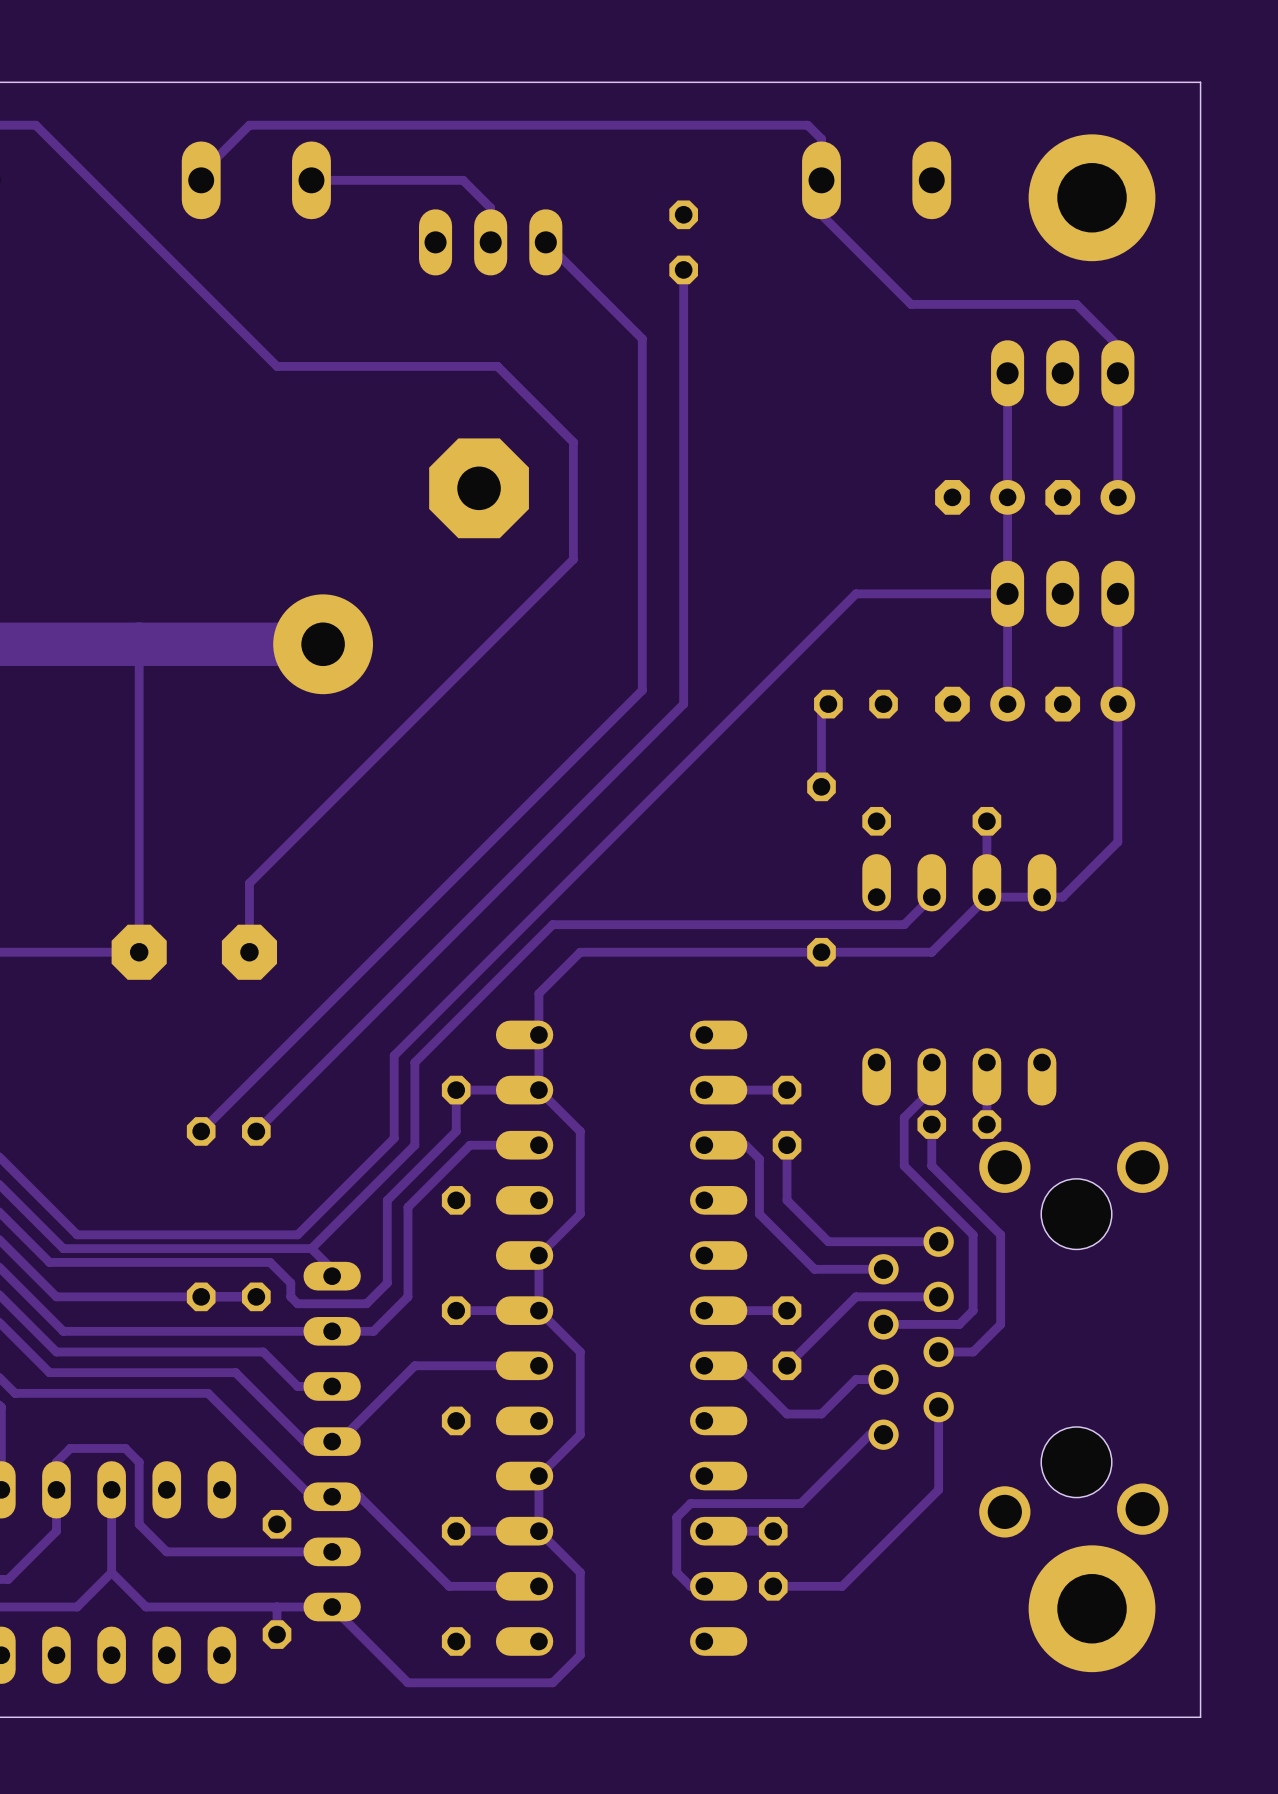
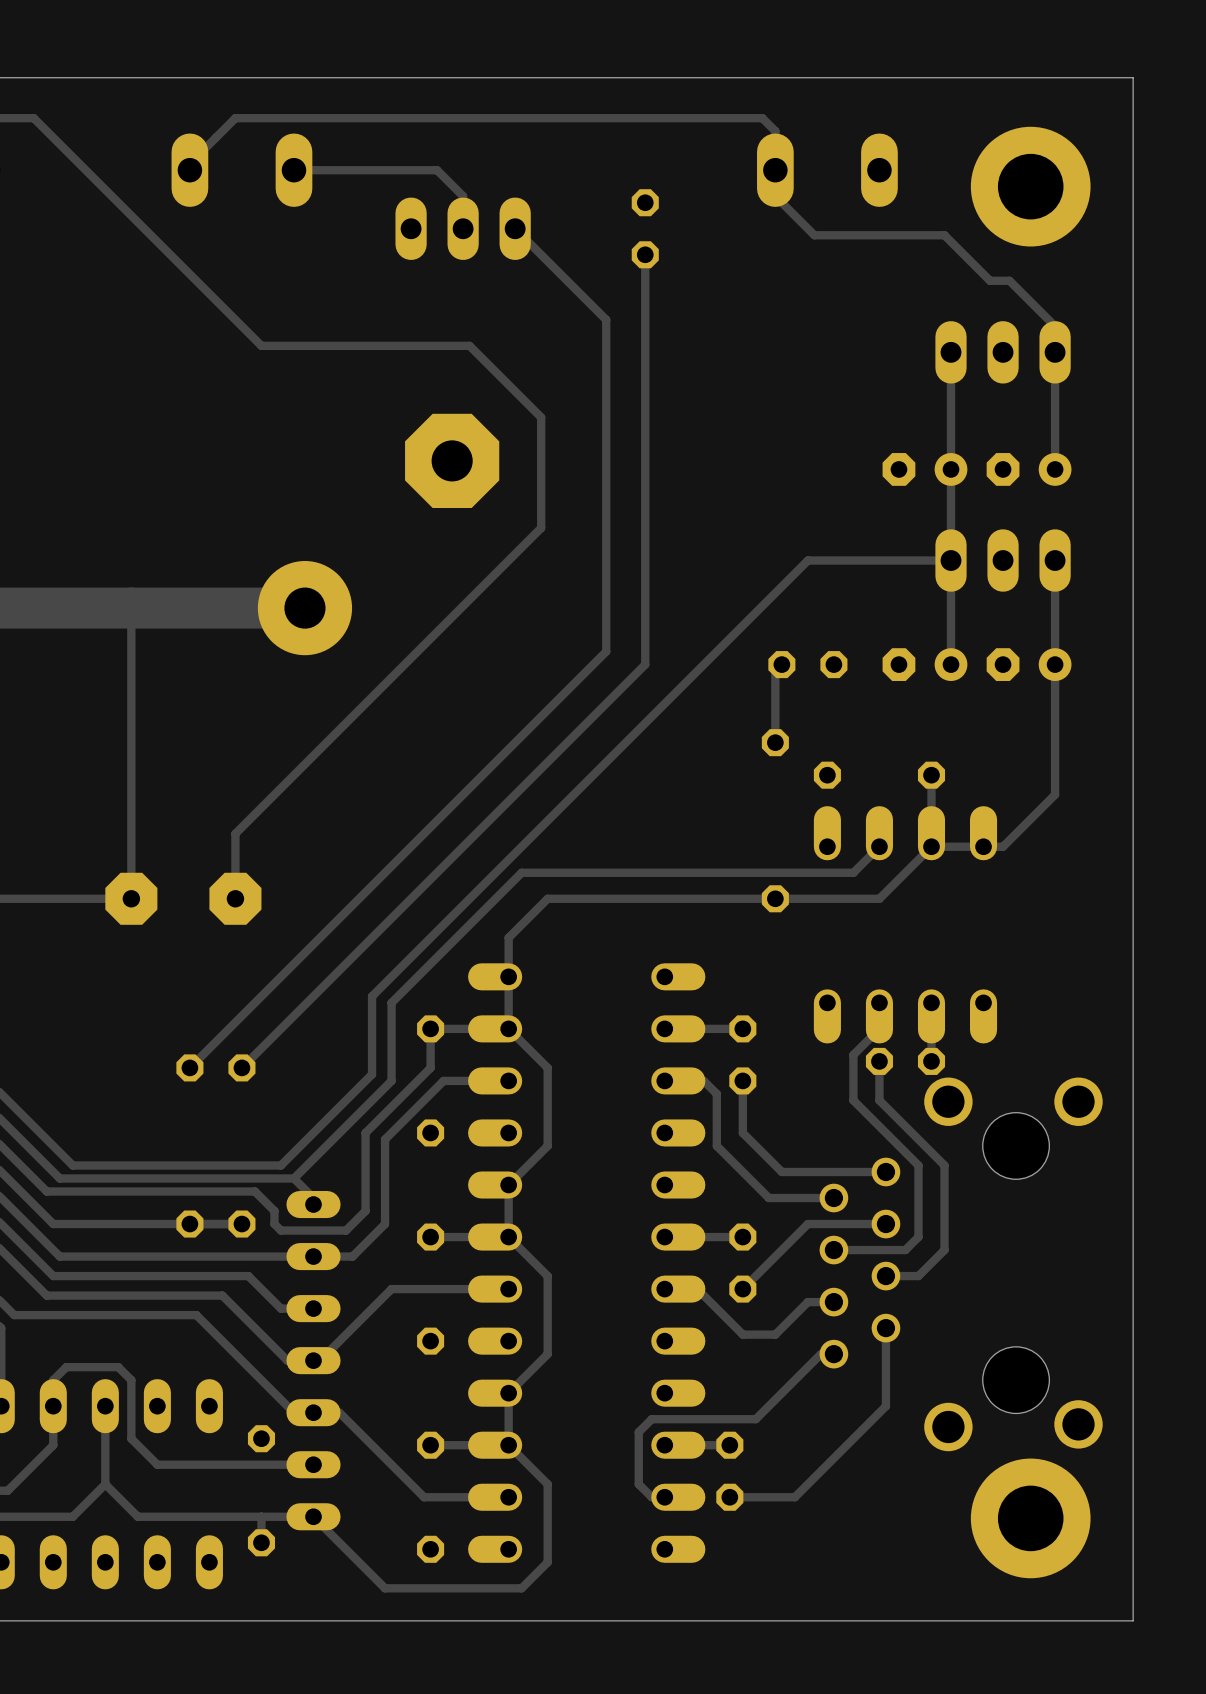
track: (821, 207) (821, 214) (911, 304) (1076, 304) -> (775, 196) (814, 235) (944, 235) (990, 280) (1009, 280) (1016, 287)

